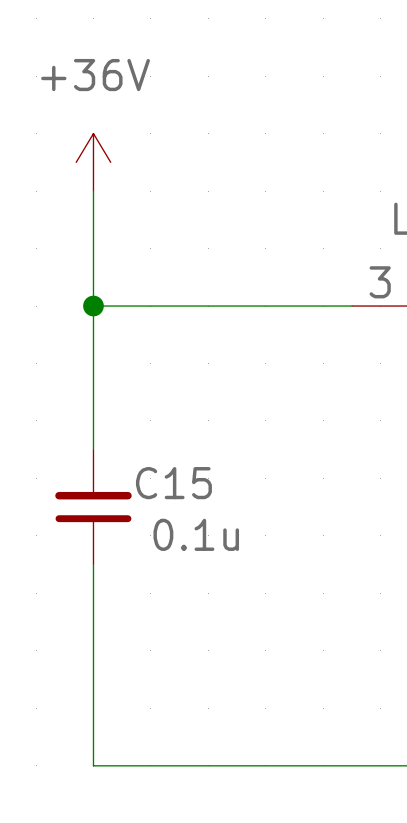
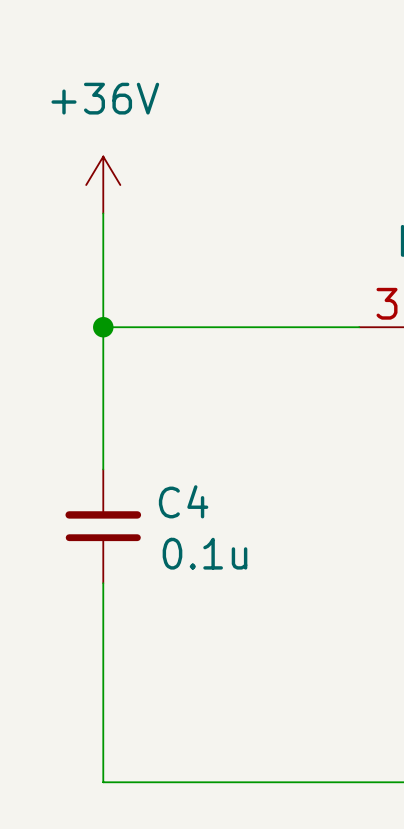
C15 name: C15 (173, 483) -> C4 (183, 501)

